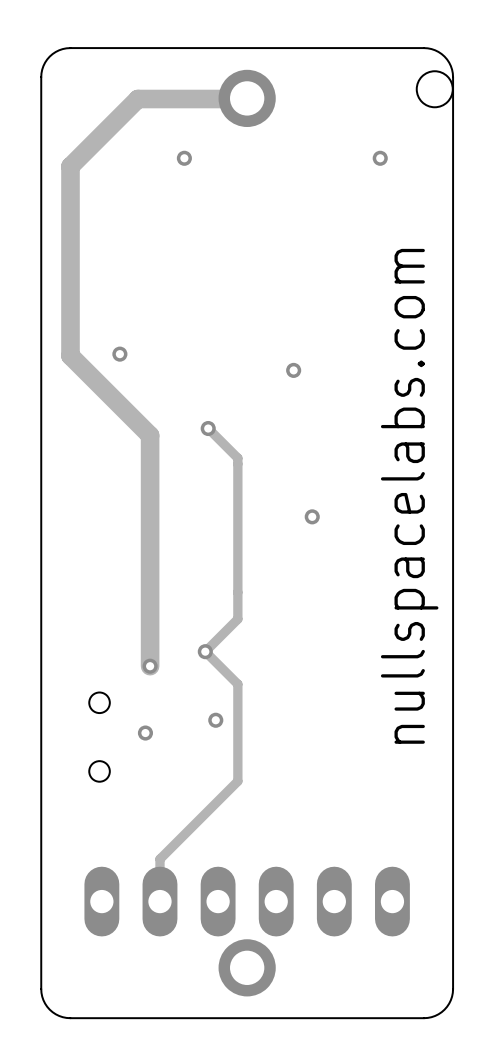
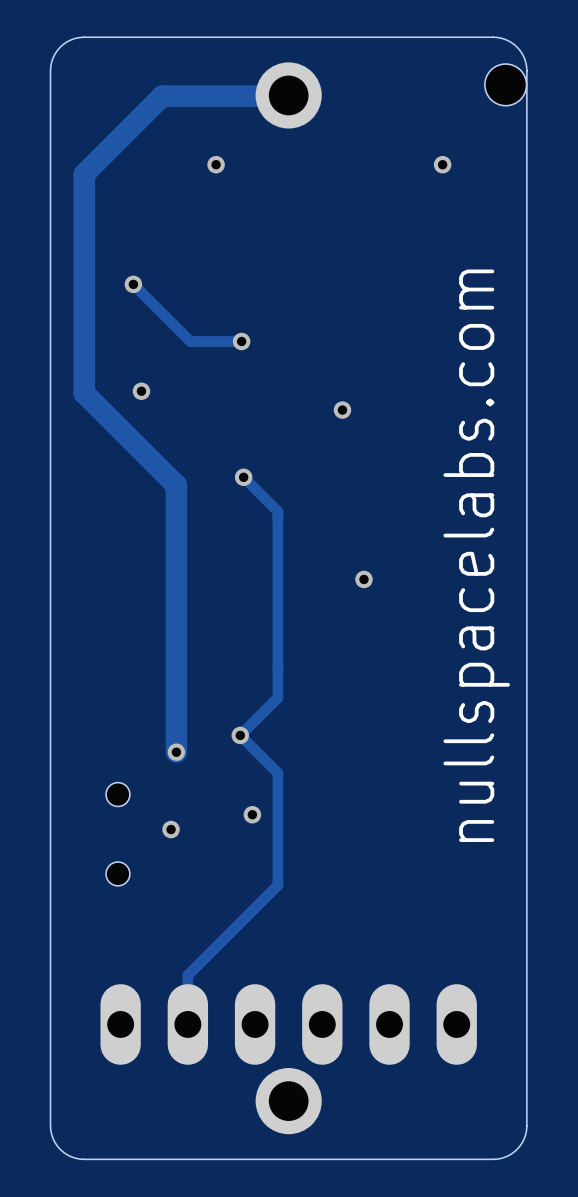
track: none -> (133, 284) (190, 341) (241, 341)
via: none -> (133, 284)
via: none -> (241, 341)

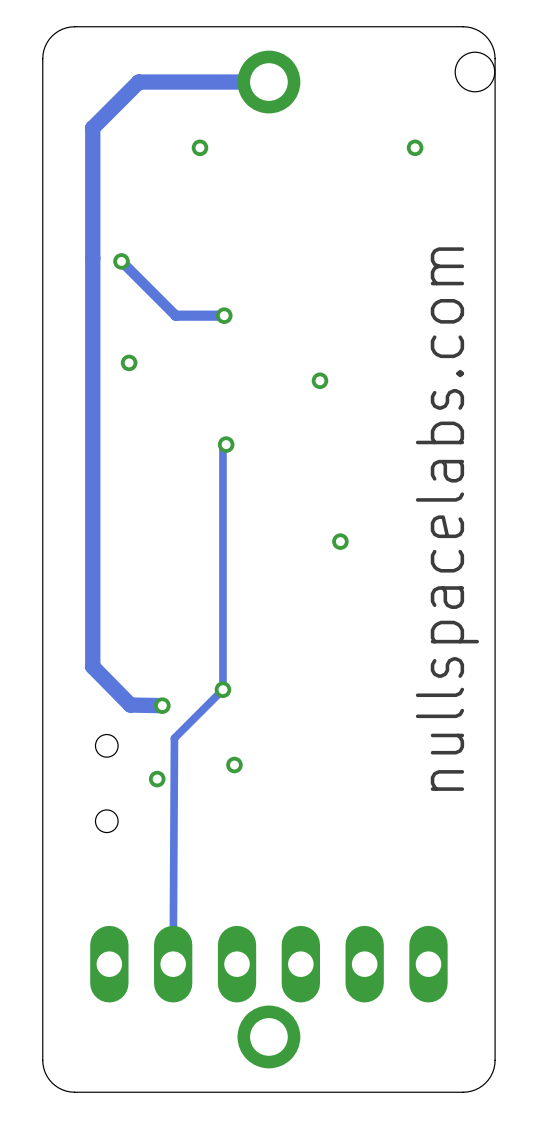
track: (288, 95) (162, 96) (84, 174) (84, 393) (176, 485) (176, 752) -> (268, 82) (138, 82) (92, 128) (92, 666) (130, 705) (162, 705)
track: (243, 477) (277, 511) (277, 697) (240, 735) (277, 773) (277, 885) (187, 975) (187, 1024) -> (226, 444) (222, 447) (222, 689) (174, 738) (173, 964)

